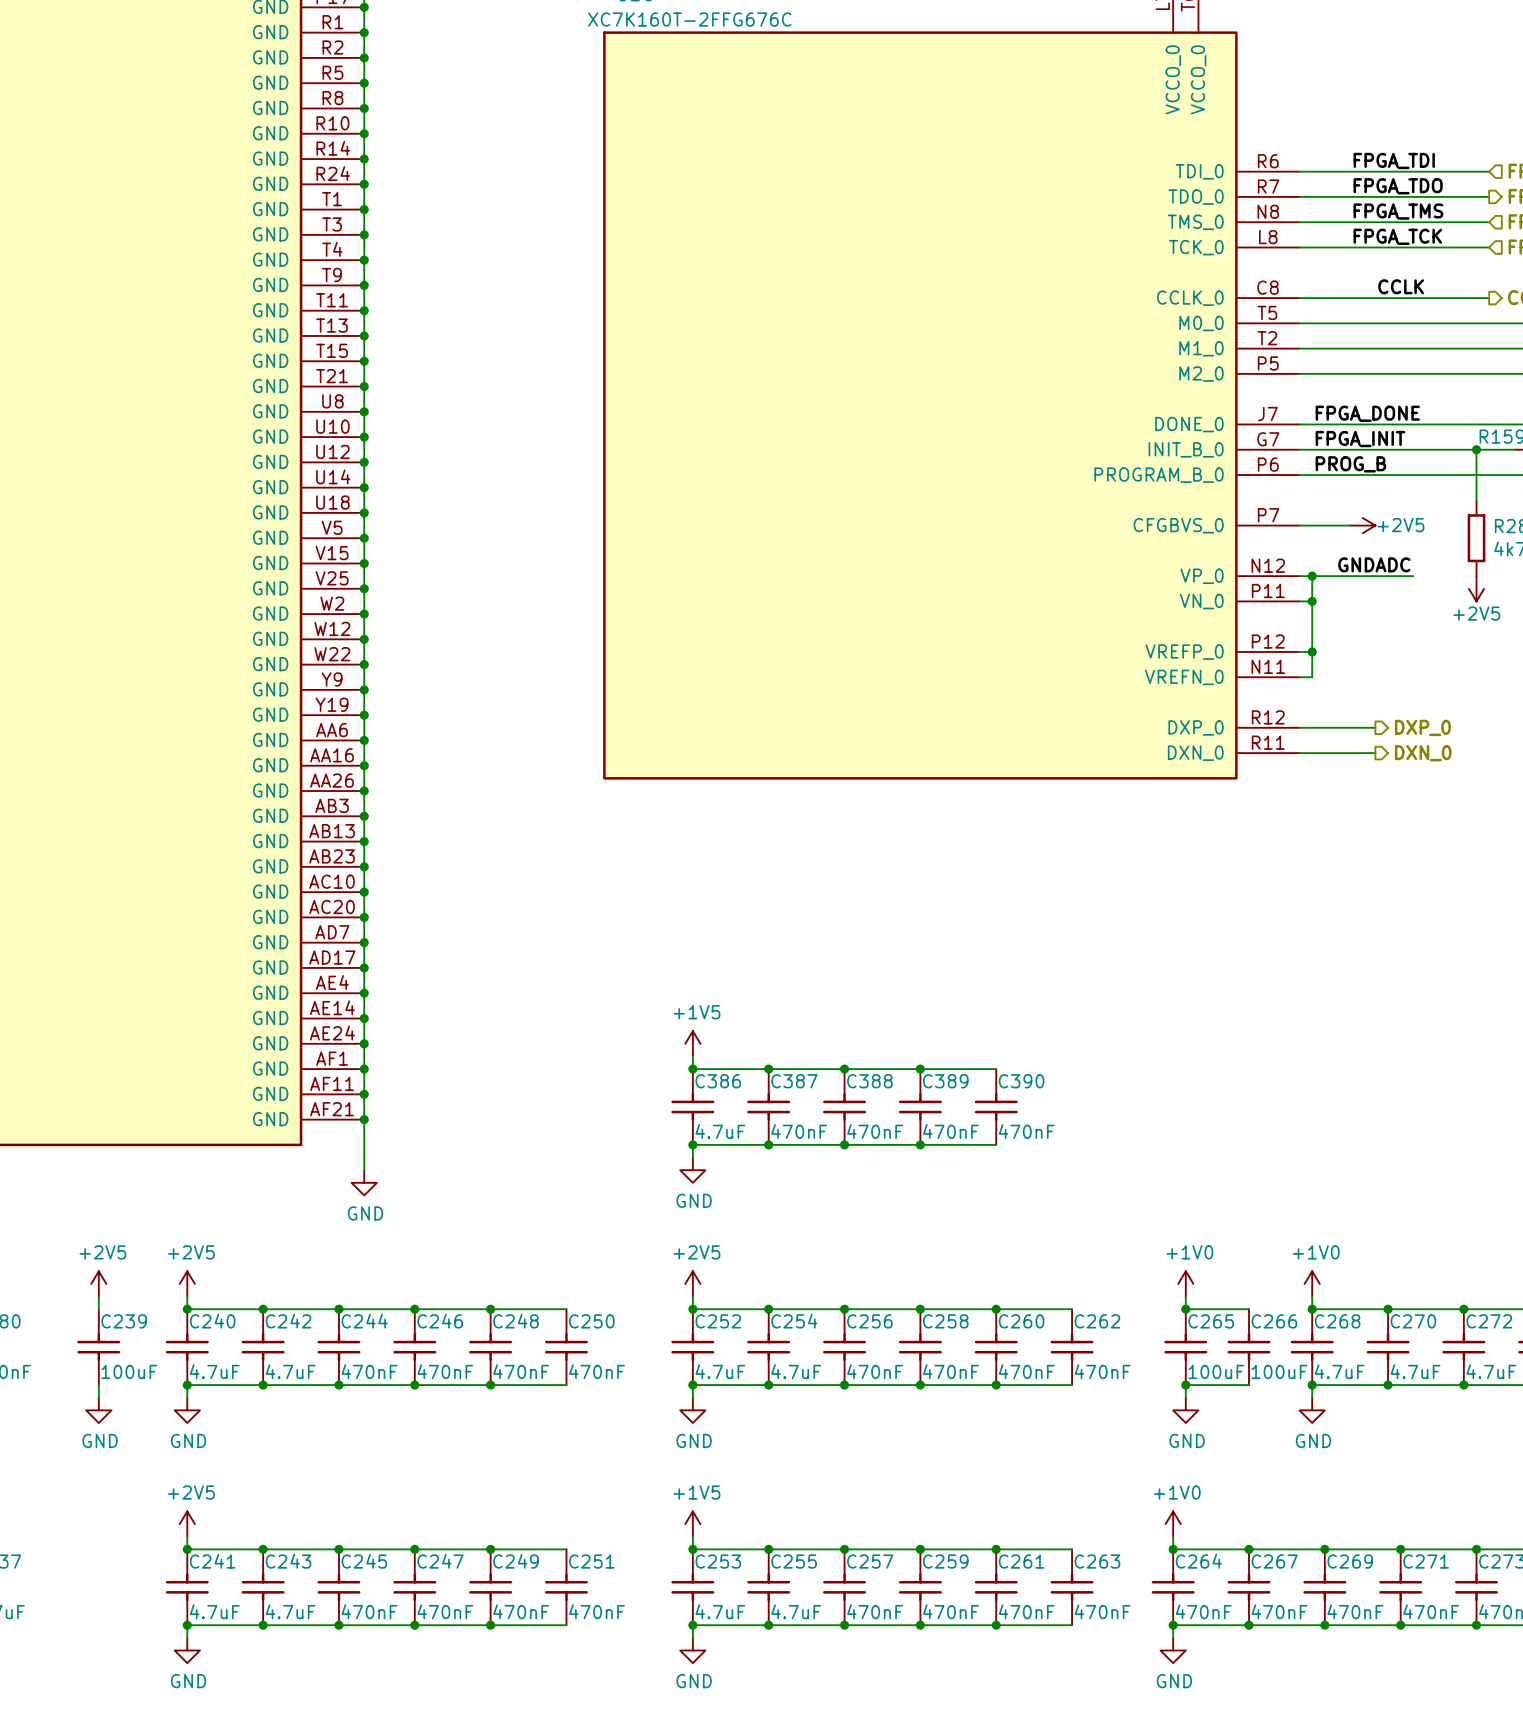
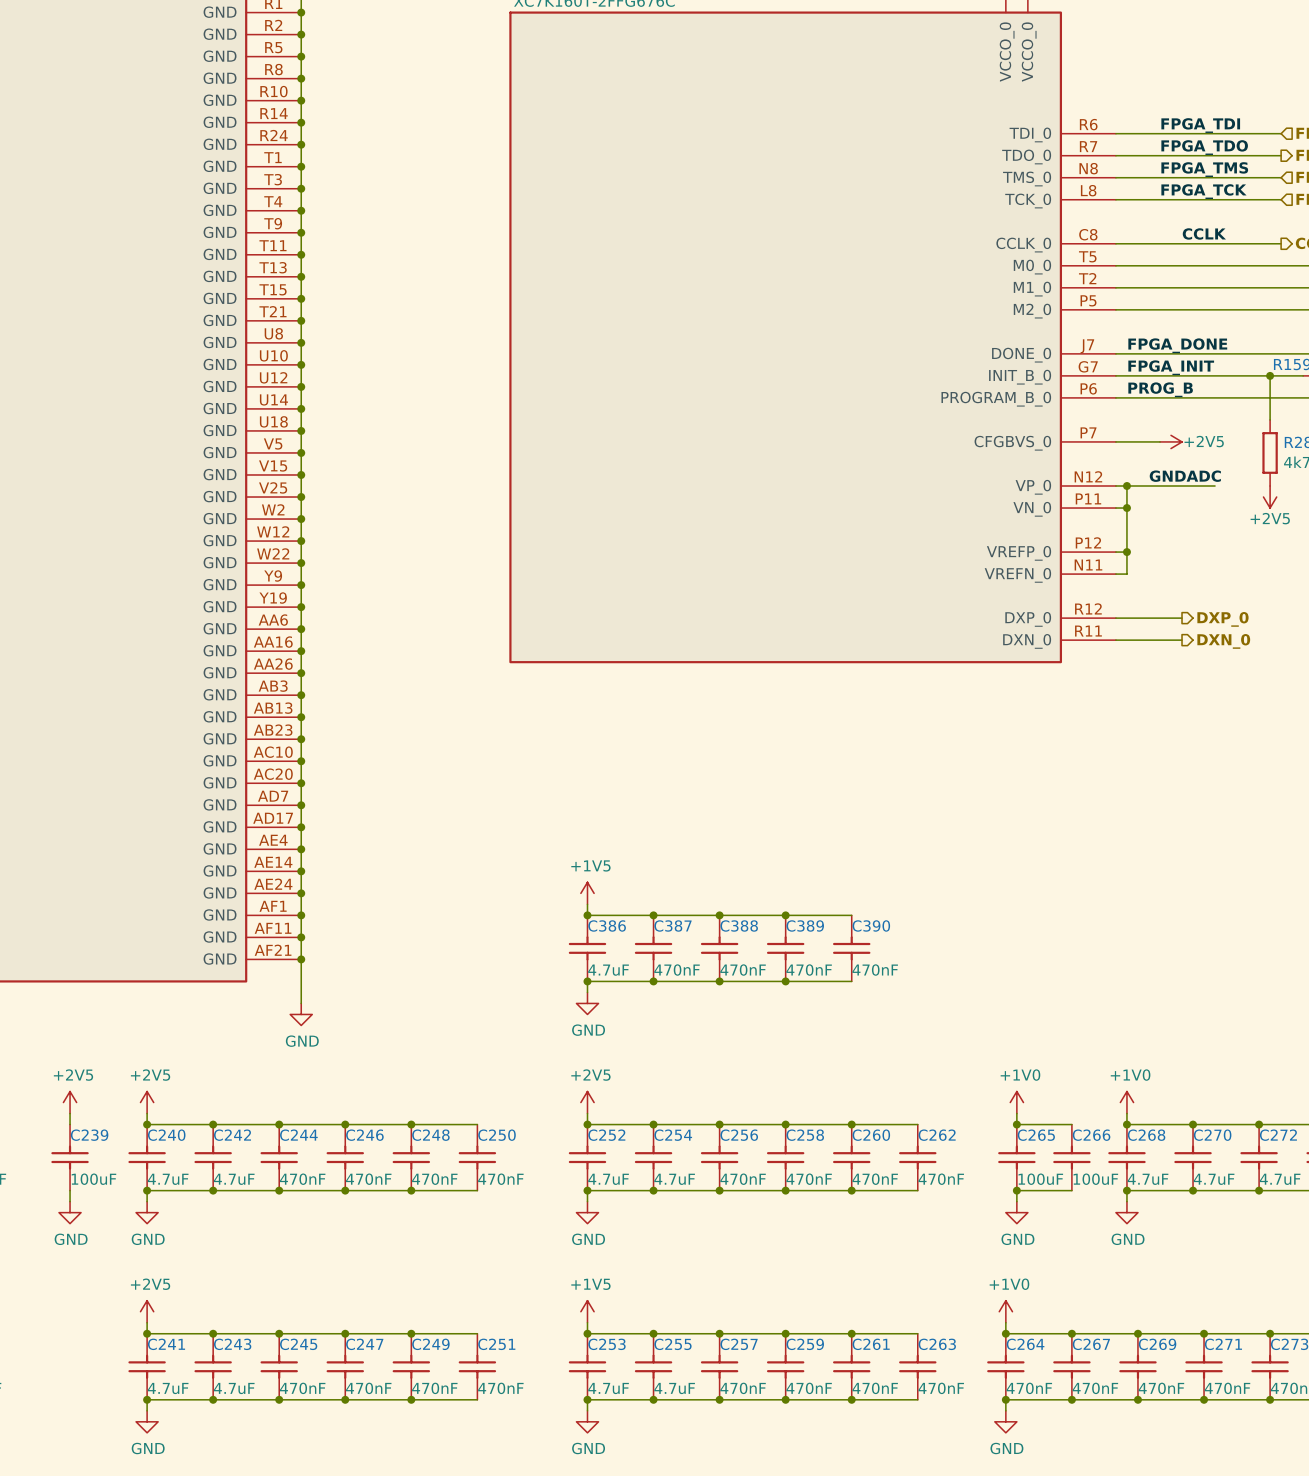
label position: GNDADC (1374, 564) -> GNDADC (1185, 476)

